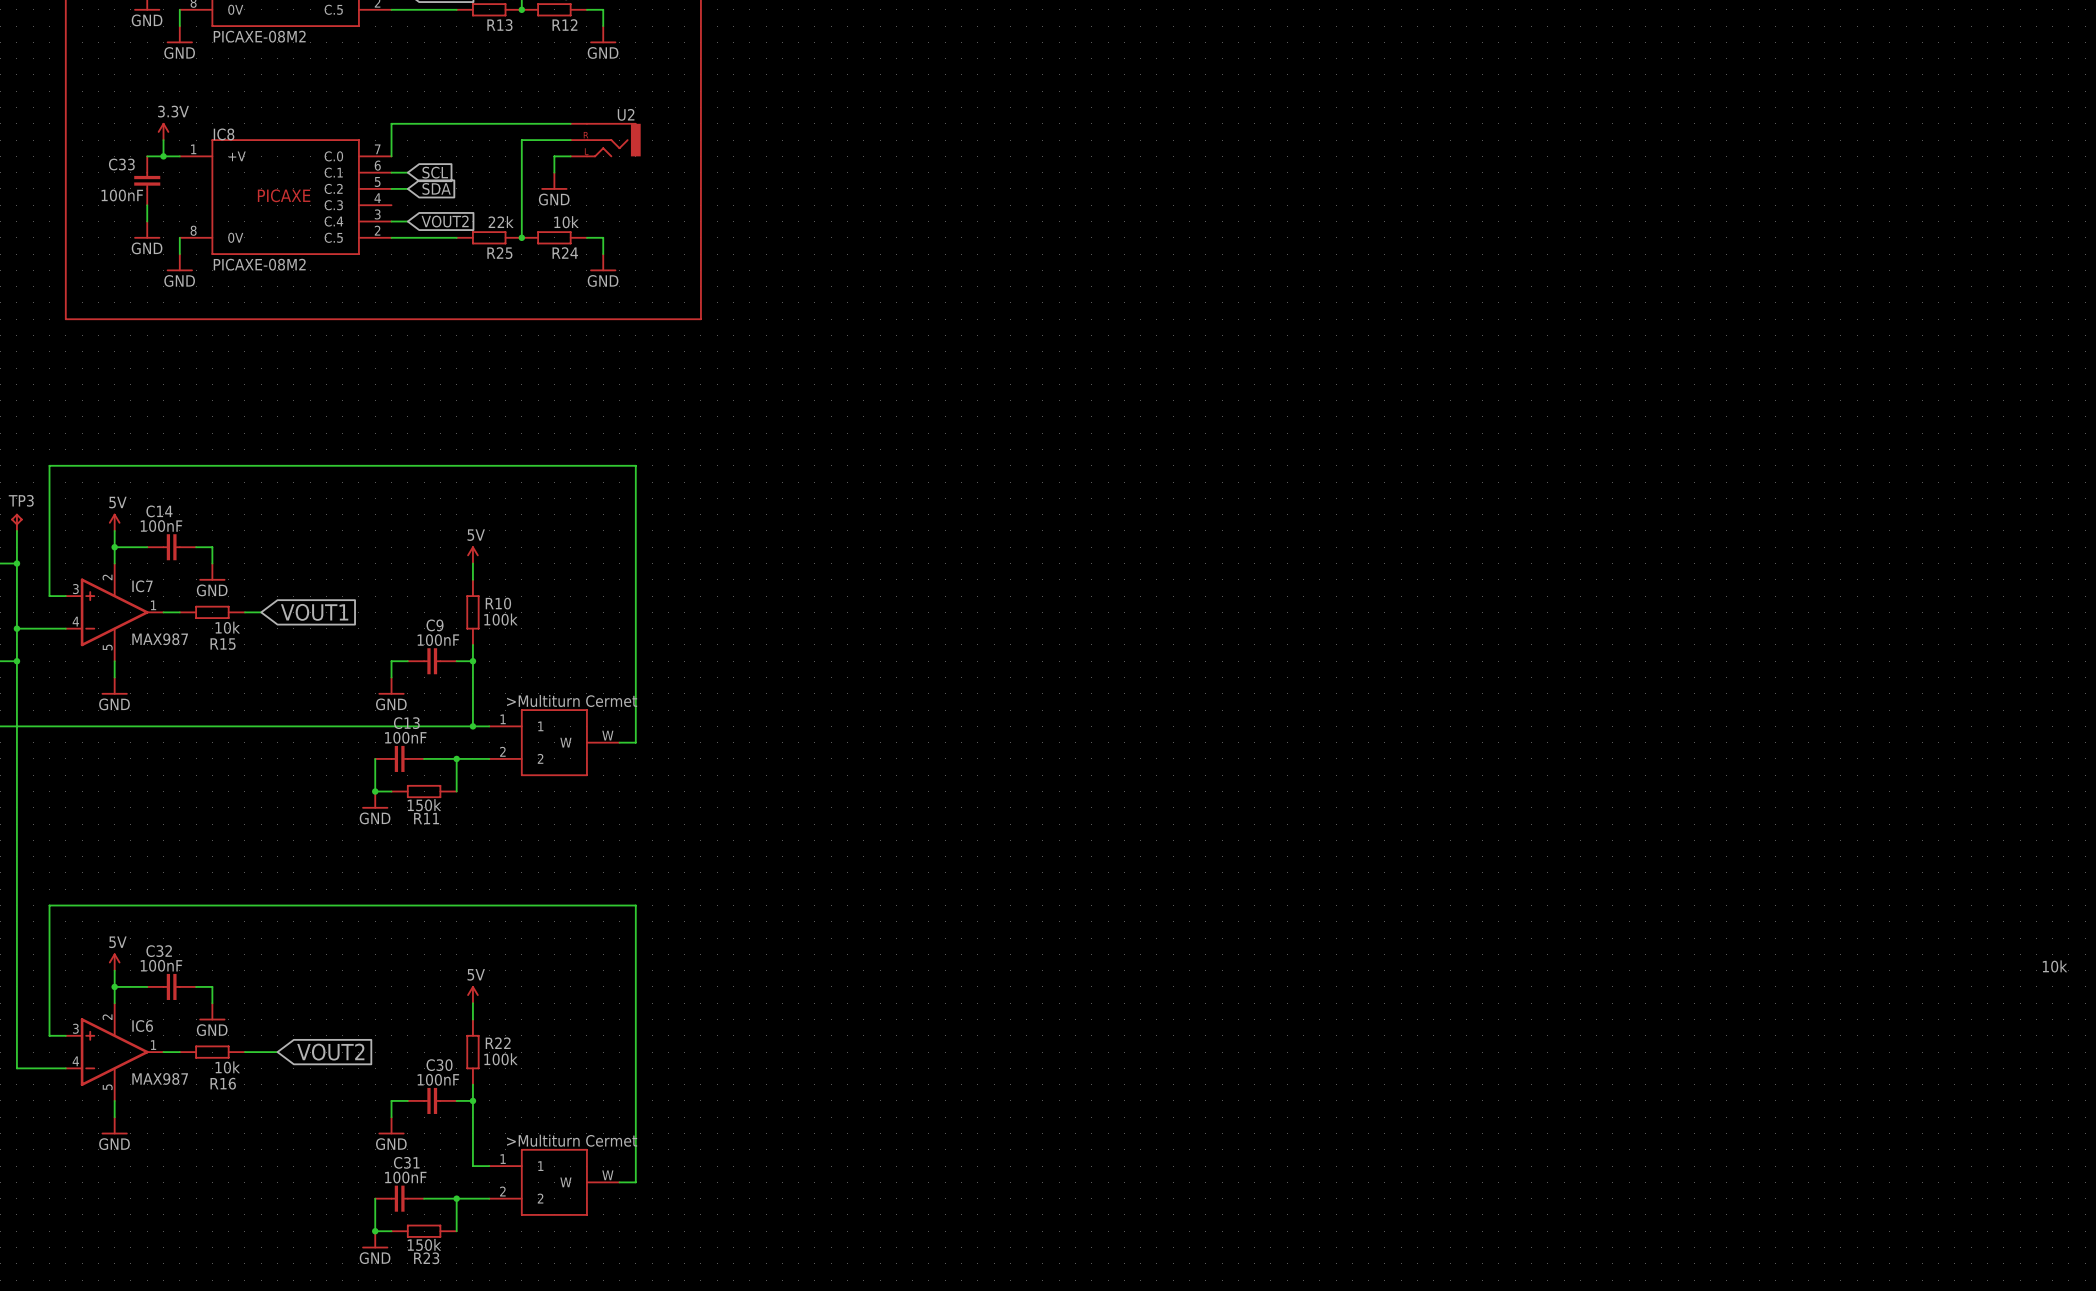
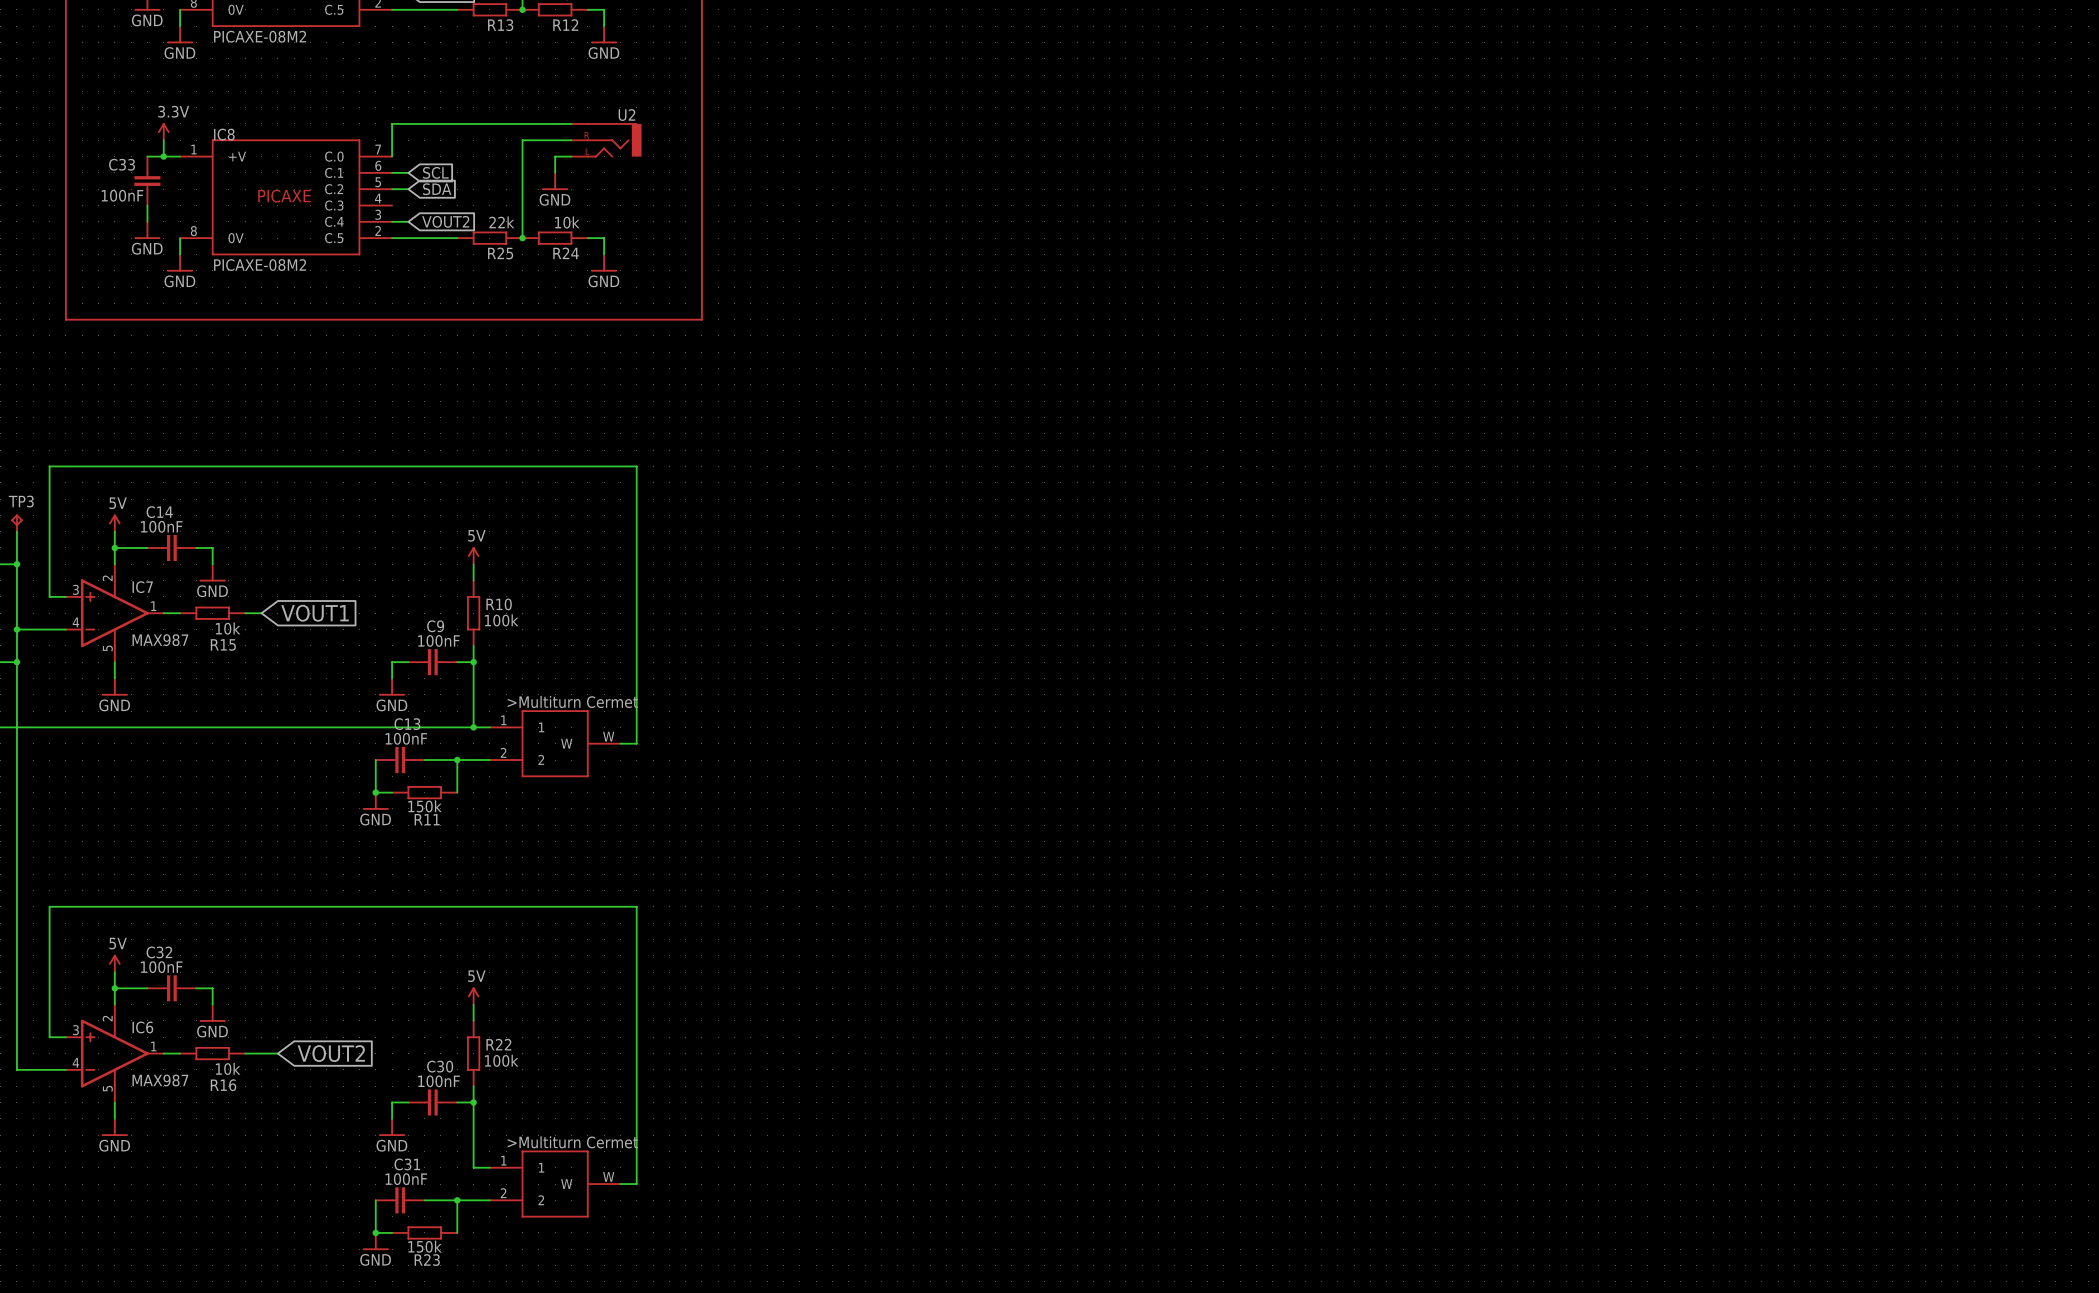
text: 10k (2055, 966) -> none

